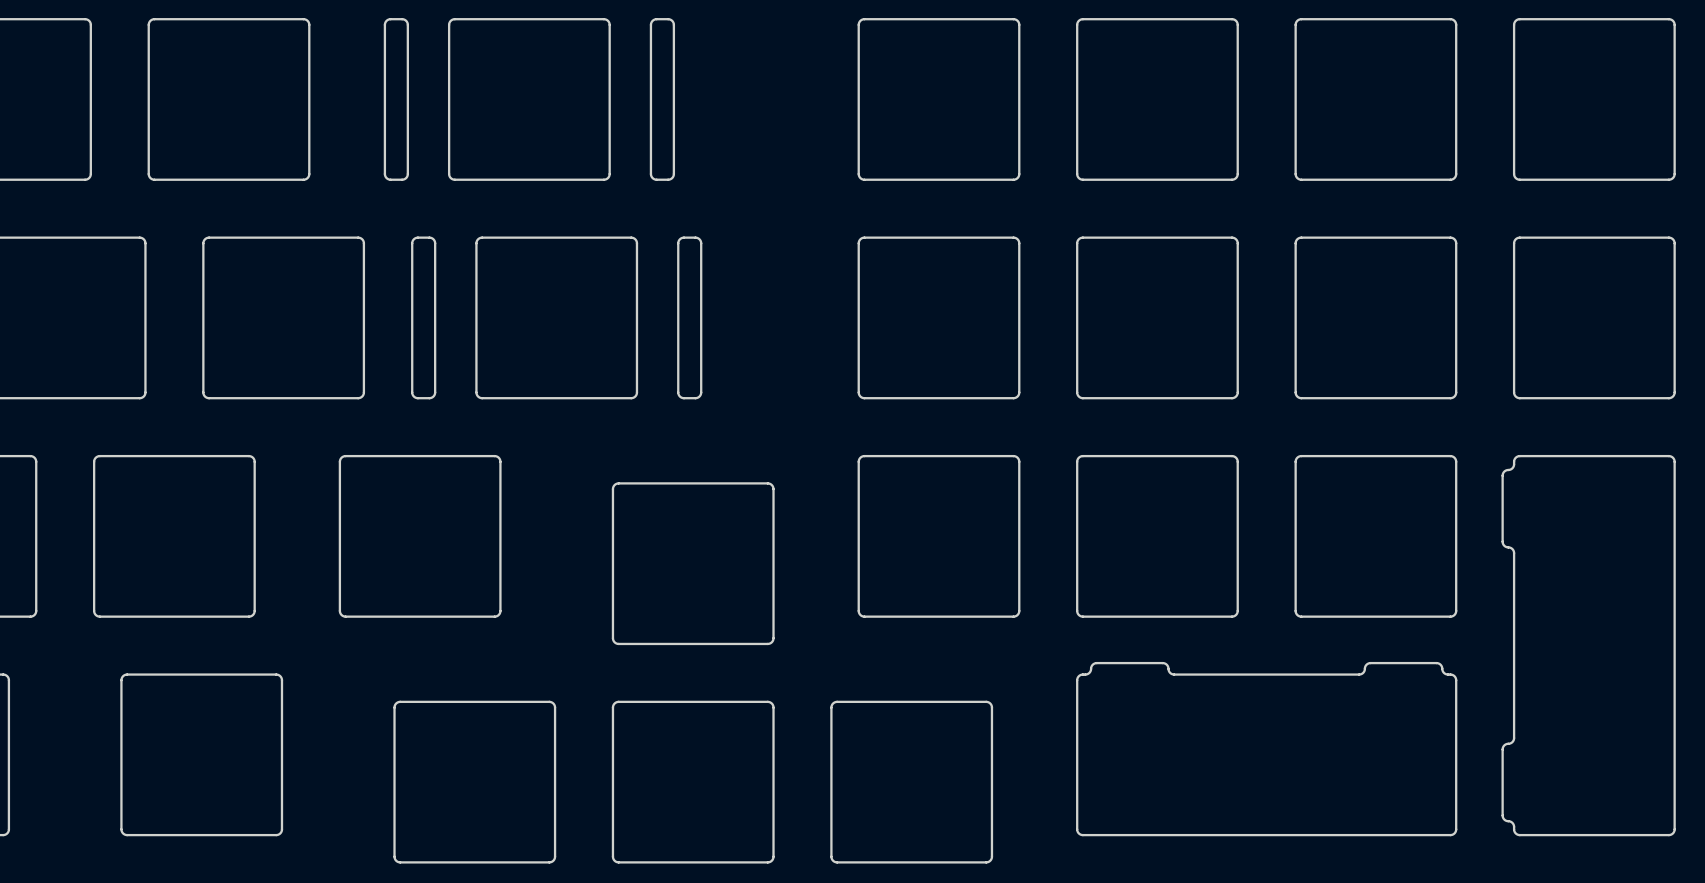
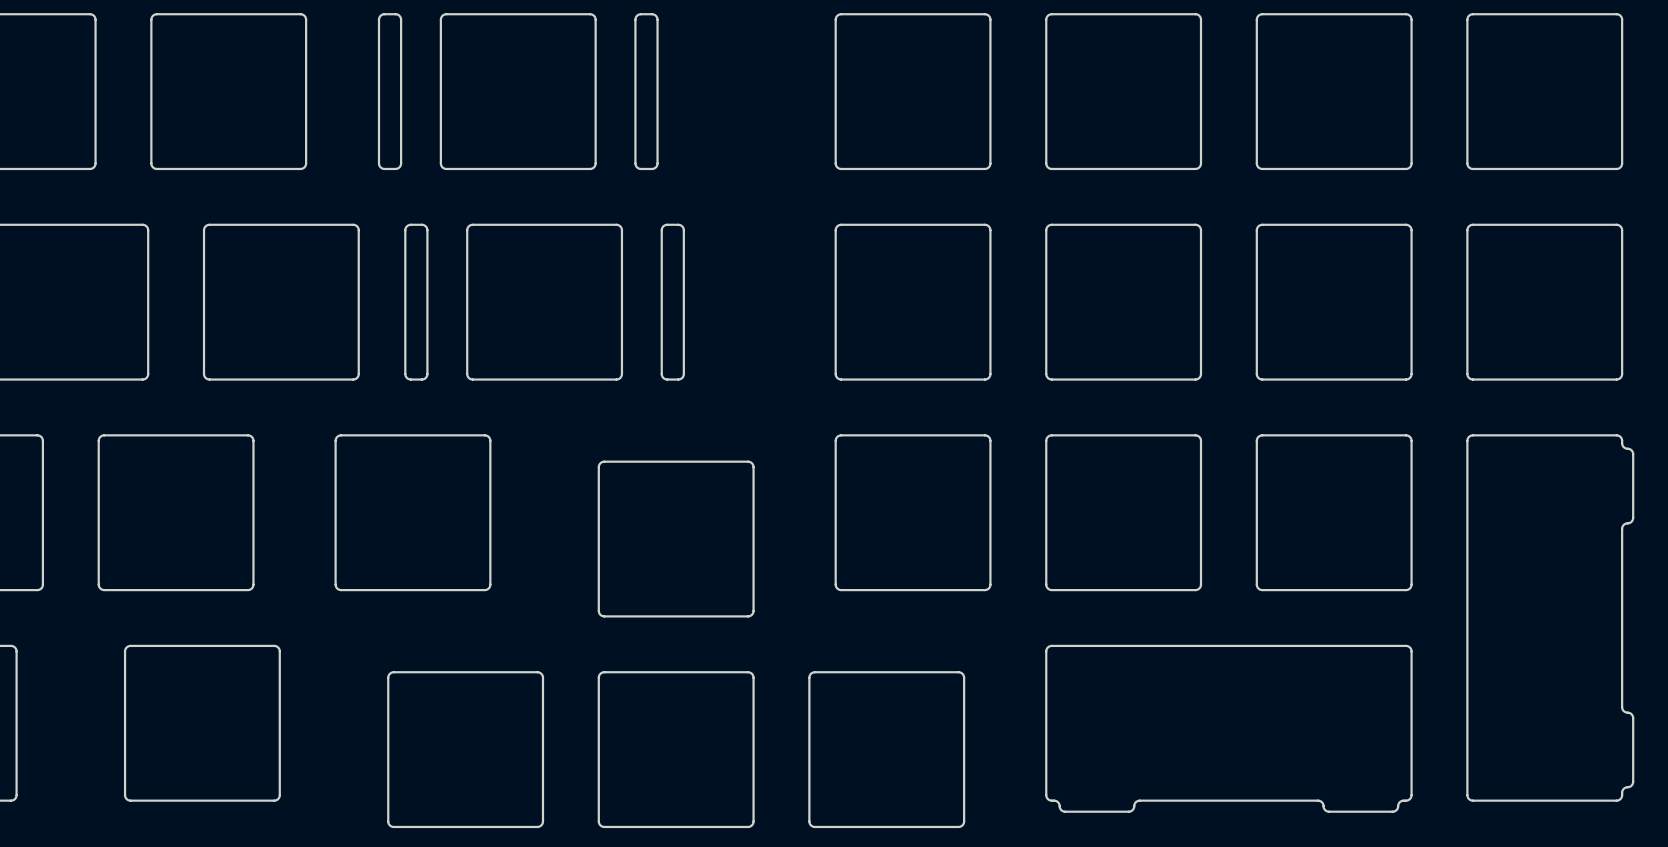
drawing shape: [1501, 454, 1676, 837] -> [1466, 434, 1635, 802]
drawing shape: [1076, 661, 1458, 837] -> [1045, 644, 1413, 813]

